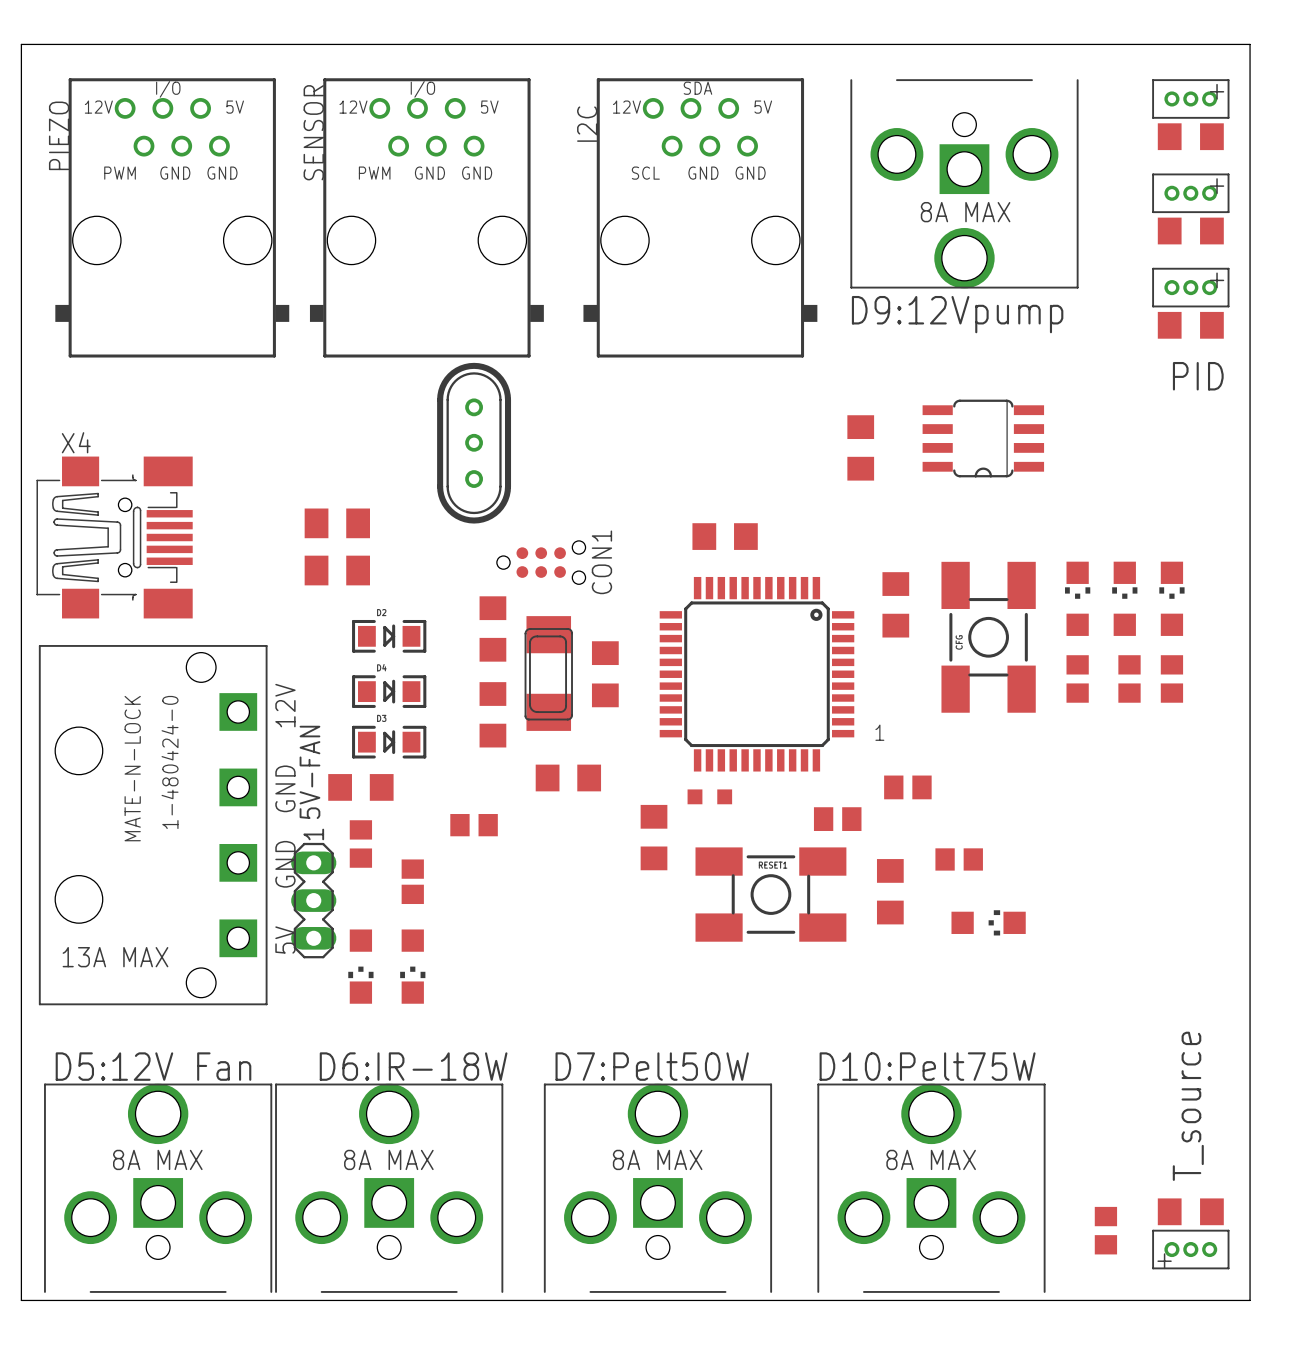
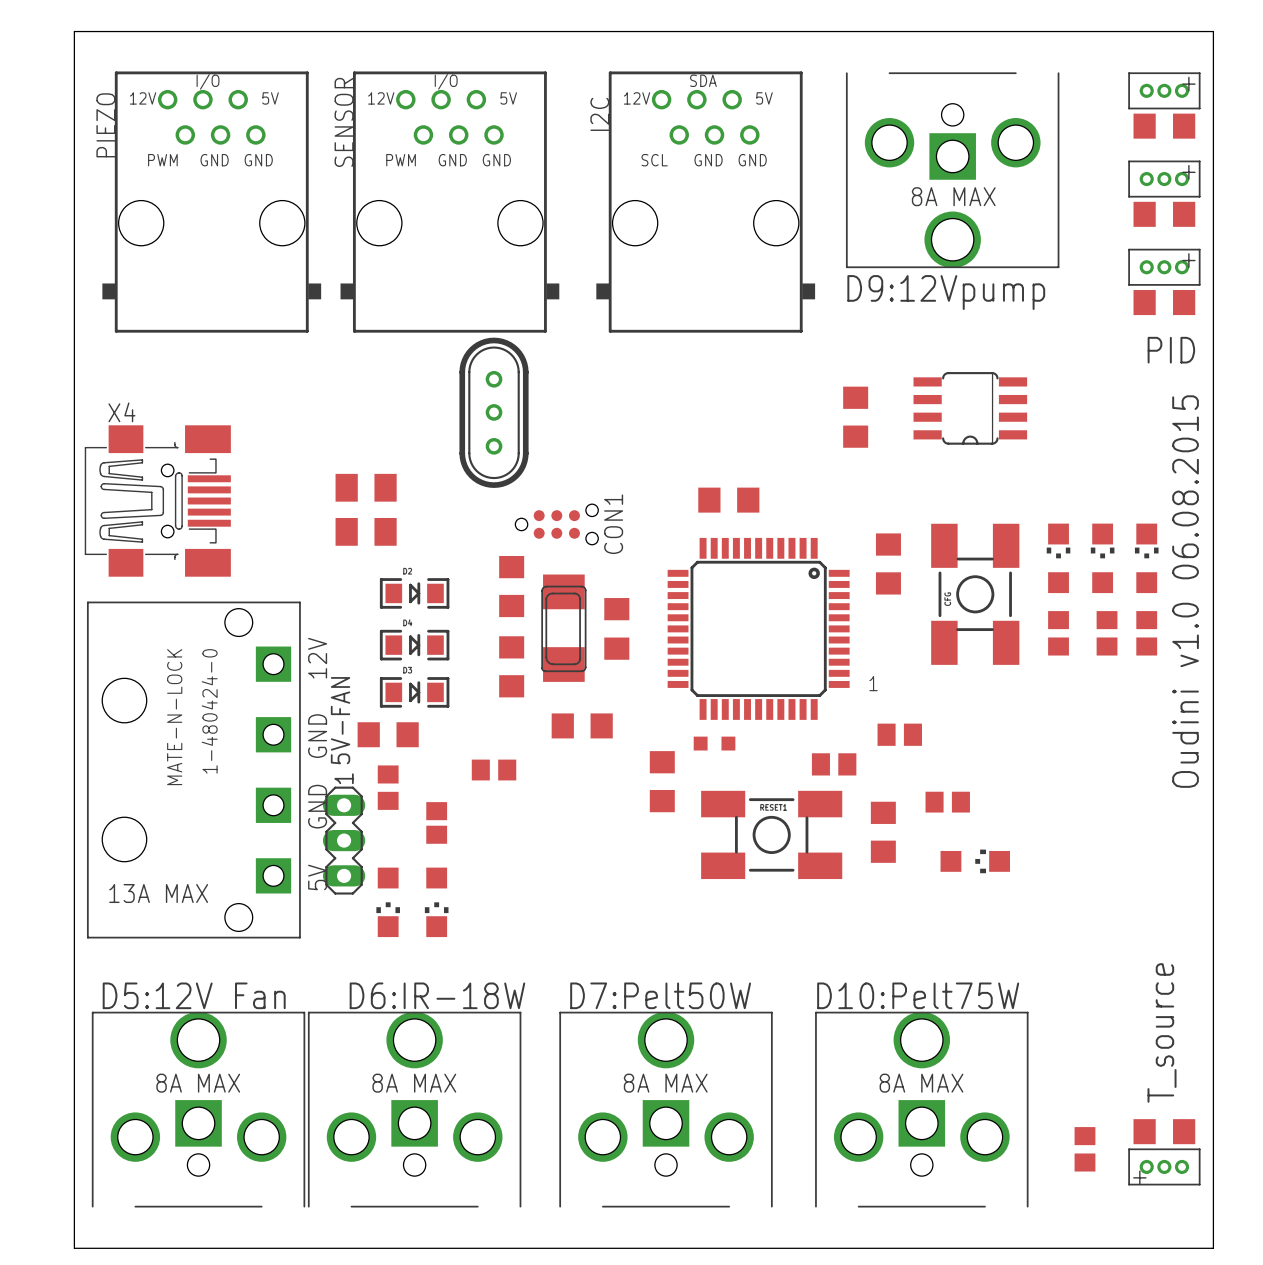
board edge: (21, 44) (1250, 44) (1250, 1300) (21, 1300) (21, 44) -> (74, 31) (74, 1248) (1213, 1248) (1213, 31) (74, 31)
text: none -> Oudini v1.0 06.08.2015 (1185, 591)

